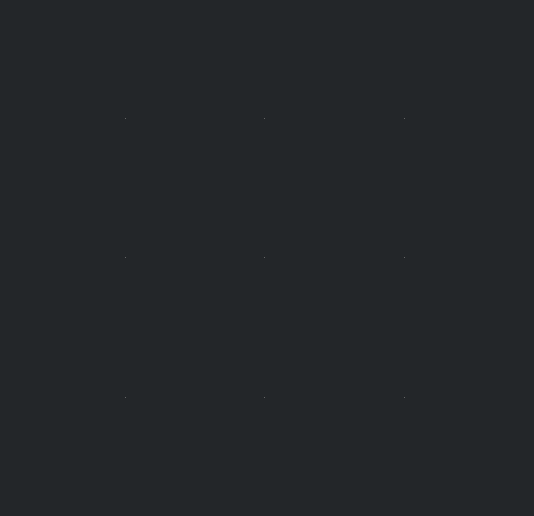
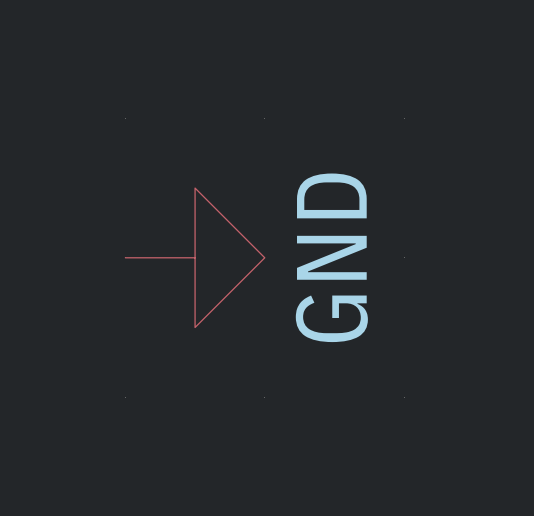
power symbol: none -> GND (195, 257)

